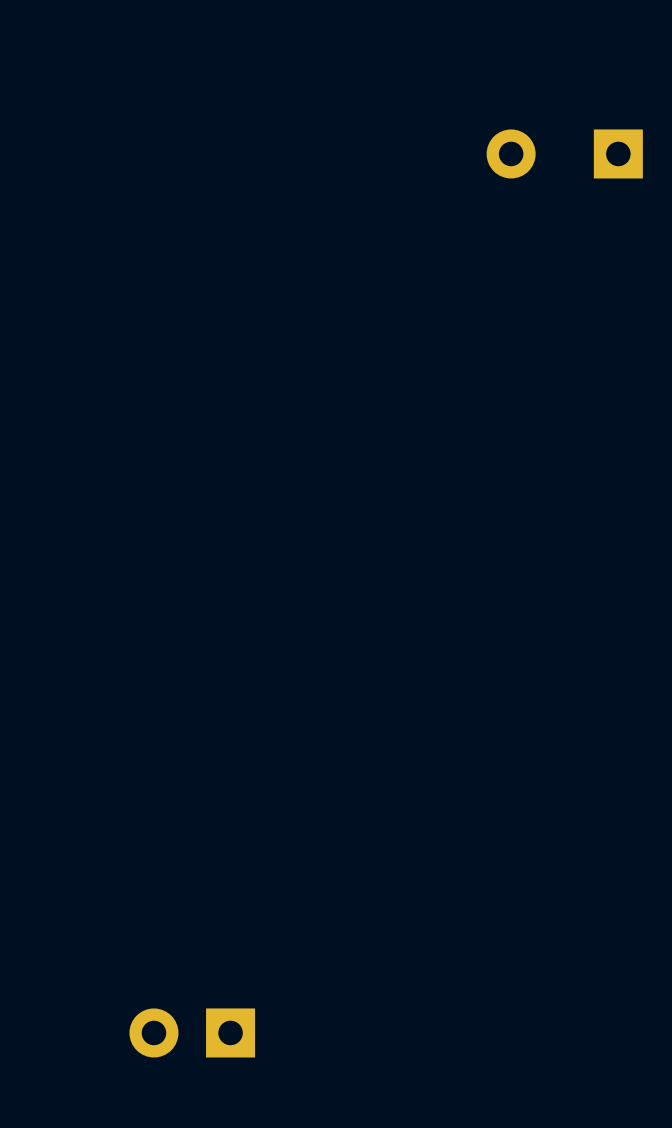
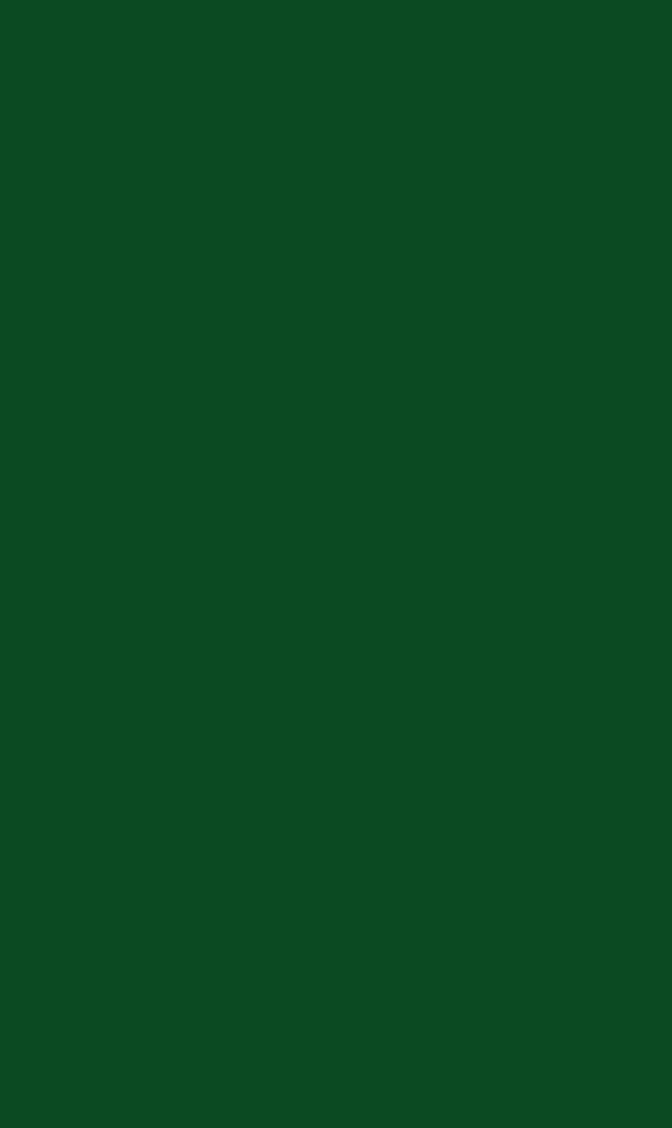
part: (564, 153) -> none
part: (192, 1032) -> none

